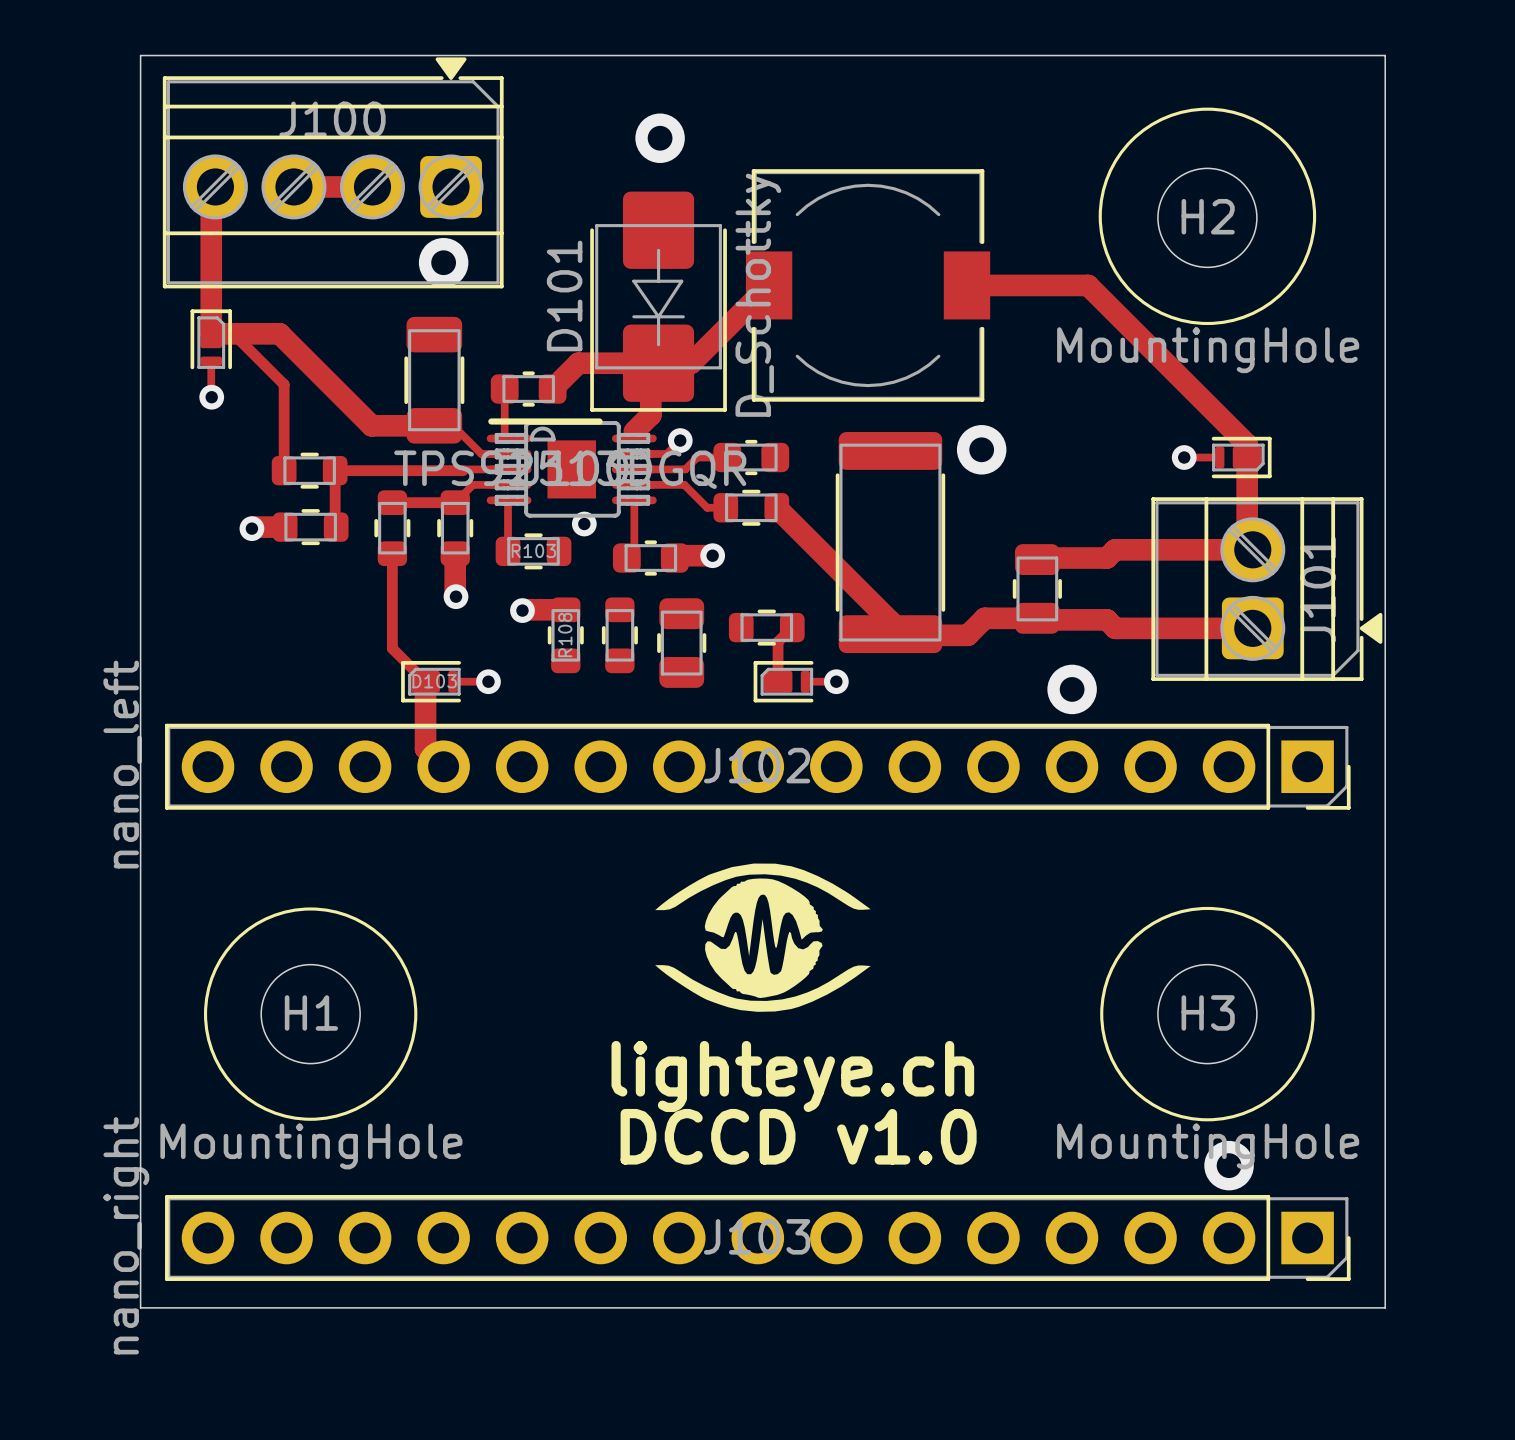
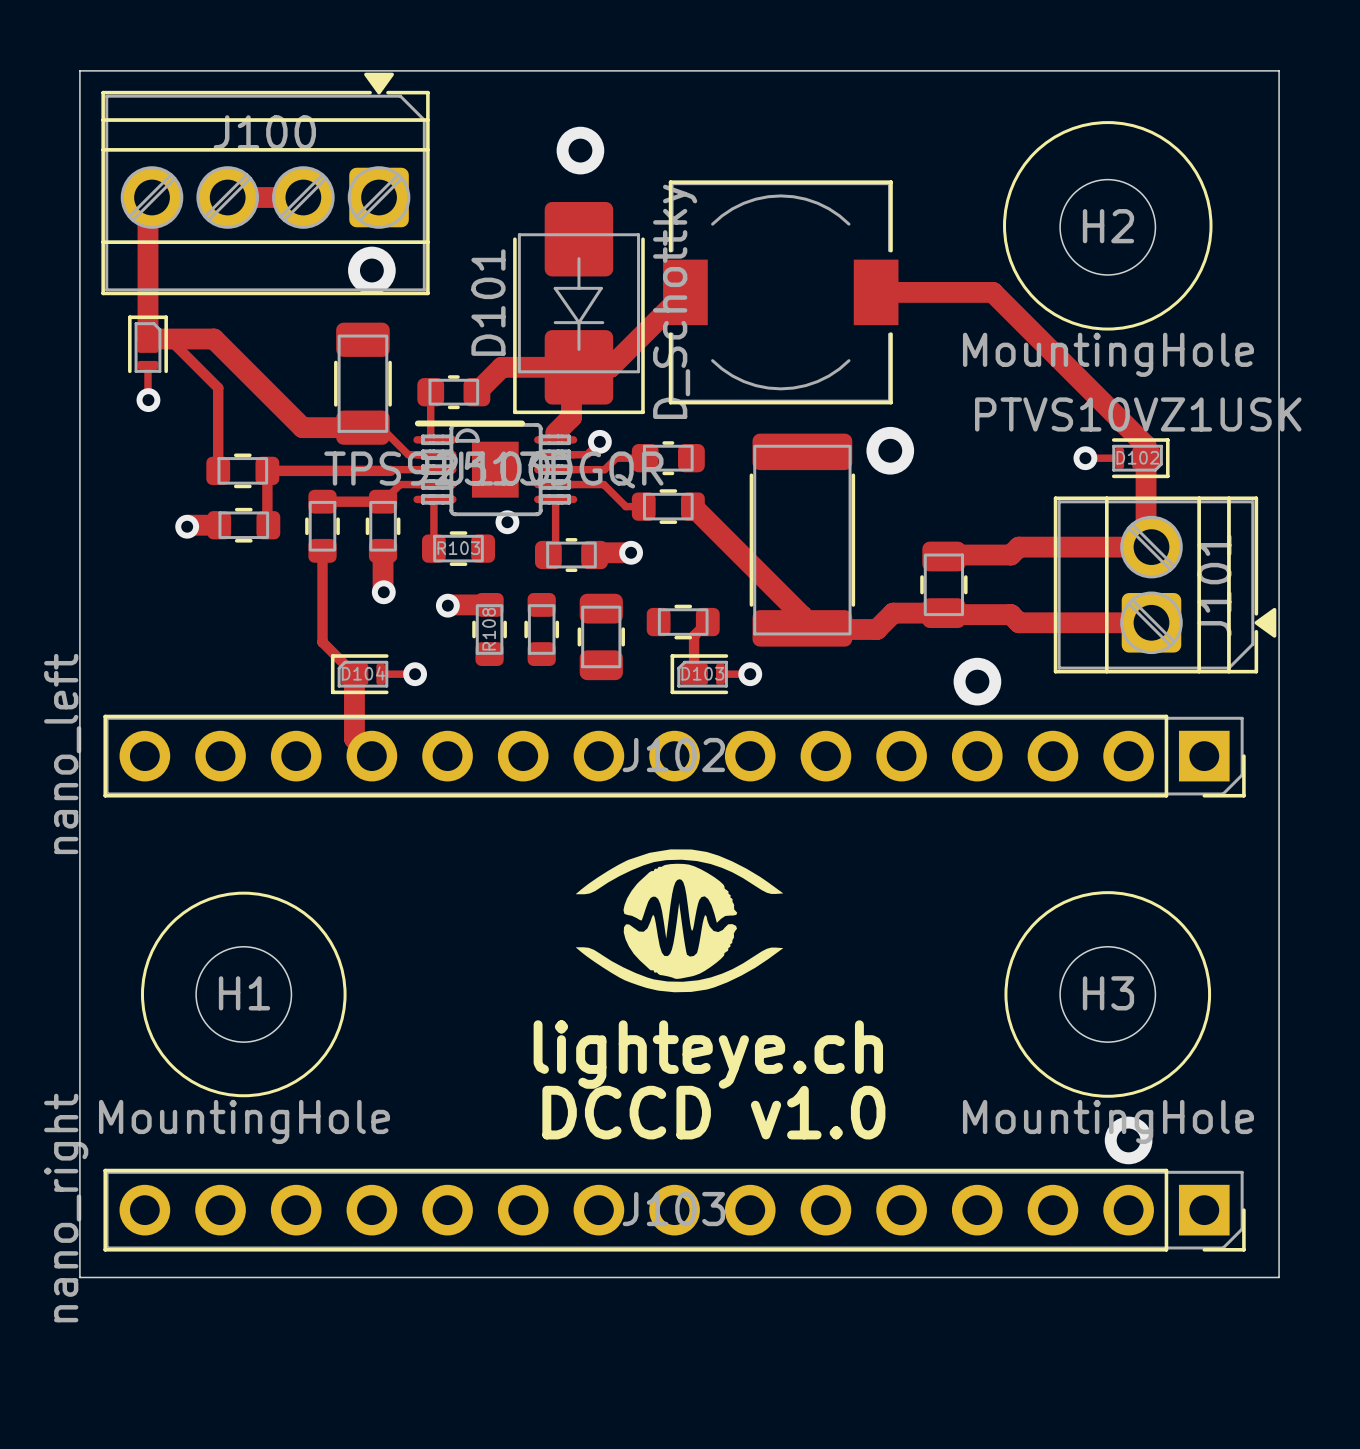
D102 value: none -> PTVS10VZ1USK (1138, 414)
D102 name: none -> D102 (1137, 457)
D103 name: D103 (434, 681) -> D104 (363, 673)
D103 name: none -> D103 (702, 673)

